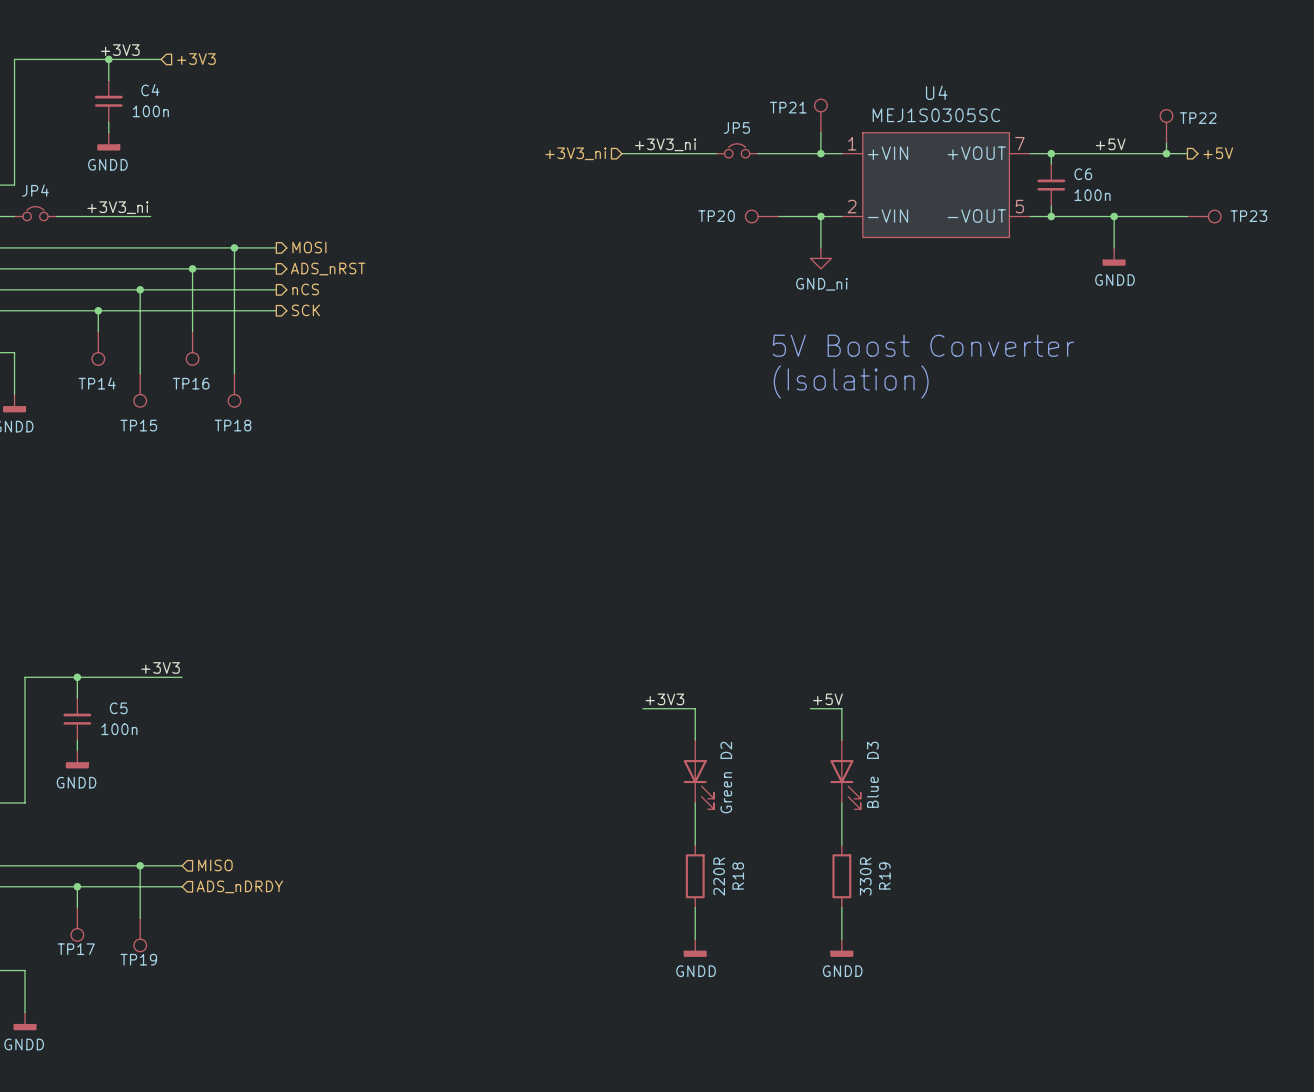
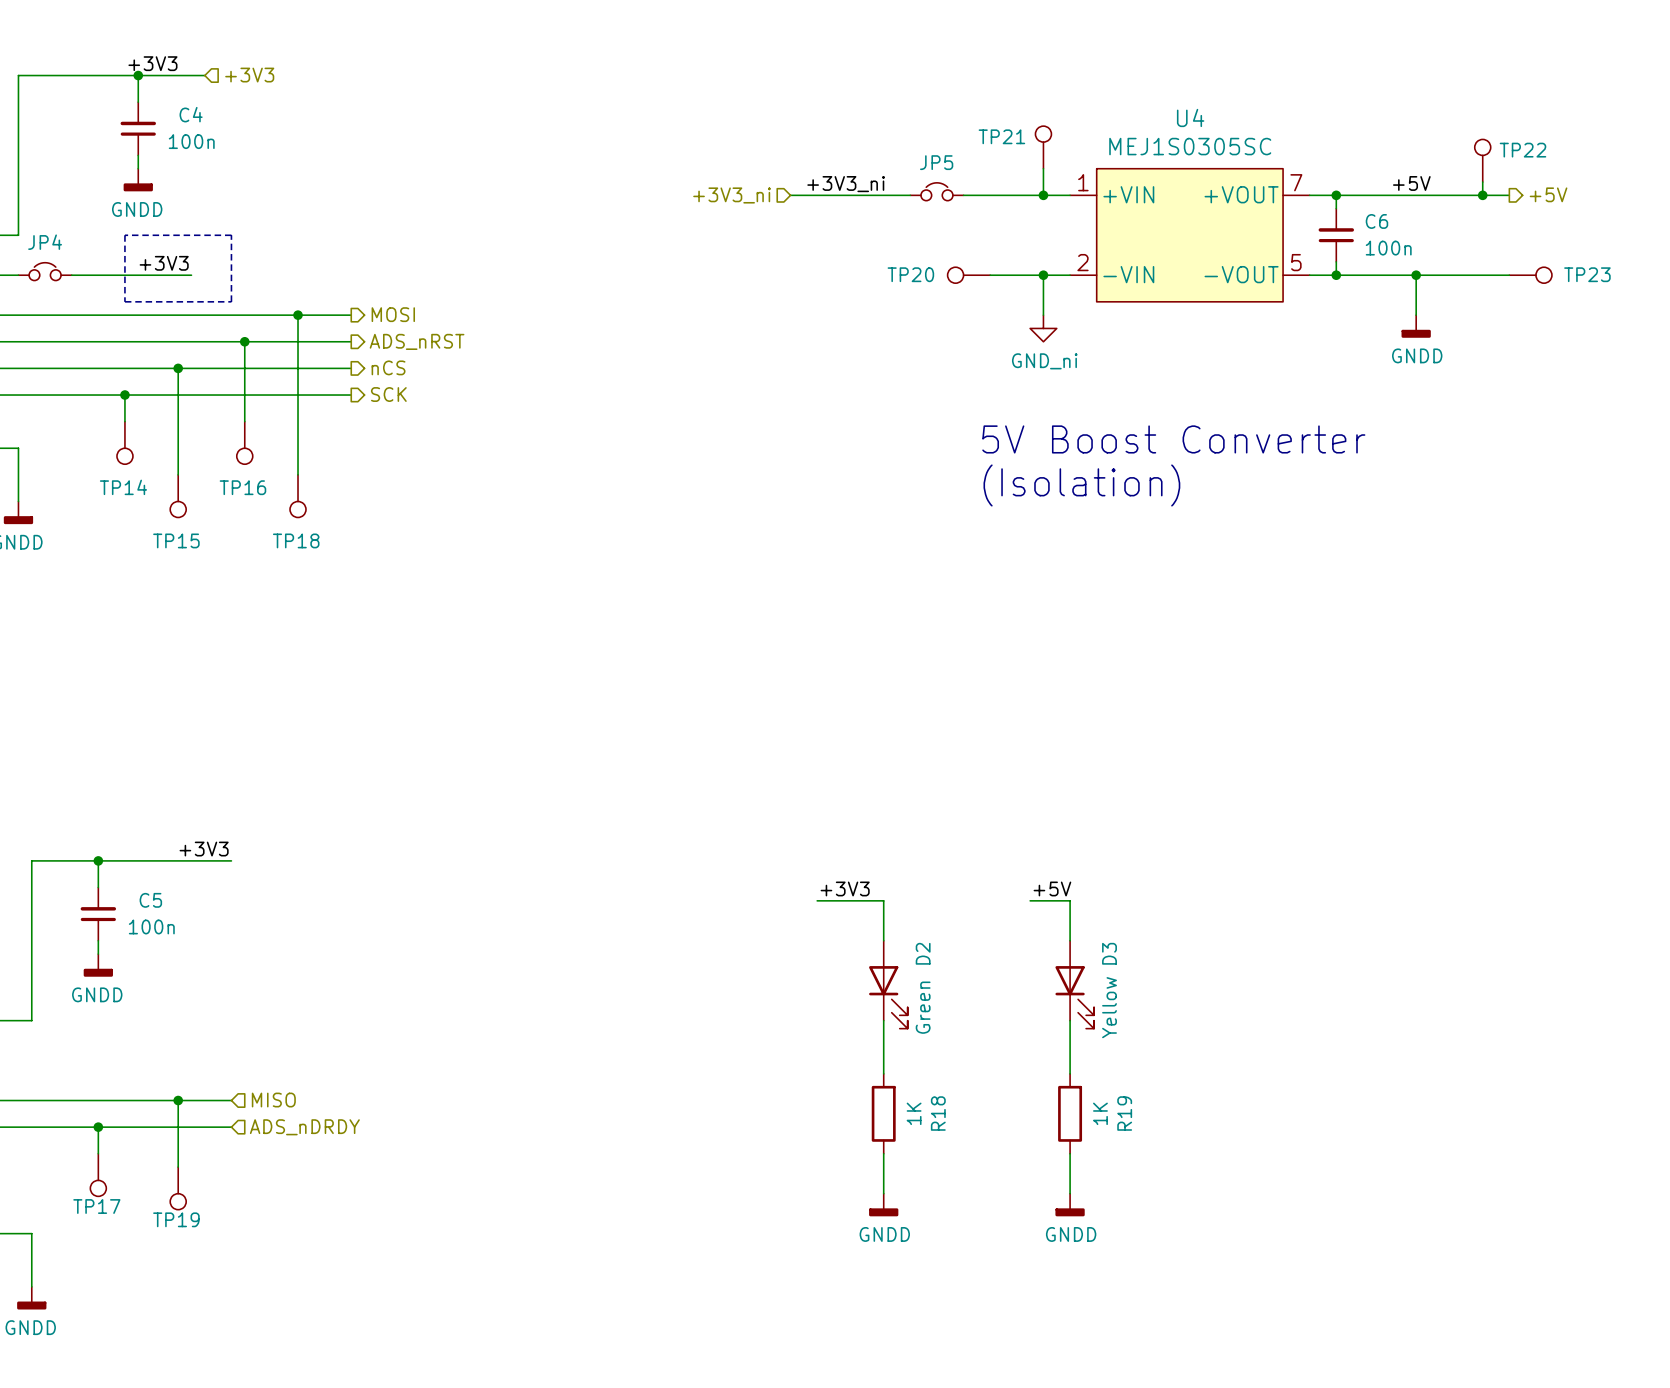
line: none -> (124, 235) (124, 301) (231, 301) (231, 235) (124, 235)
label: +3V3_ni (117, 207) -> +3V3 (164, 263)
D3 value: Blue (872, 792) -> Yellow (1109, 1007)
R18 value: 220R (719, 876) -> 1K (914, 1113)
R19 value: 330R (865, 876) -> 1K (1100, 1113)

